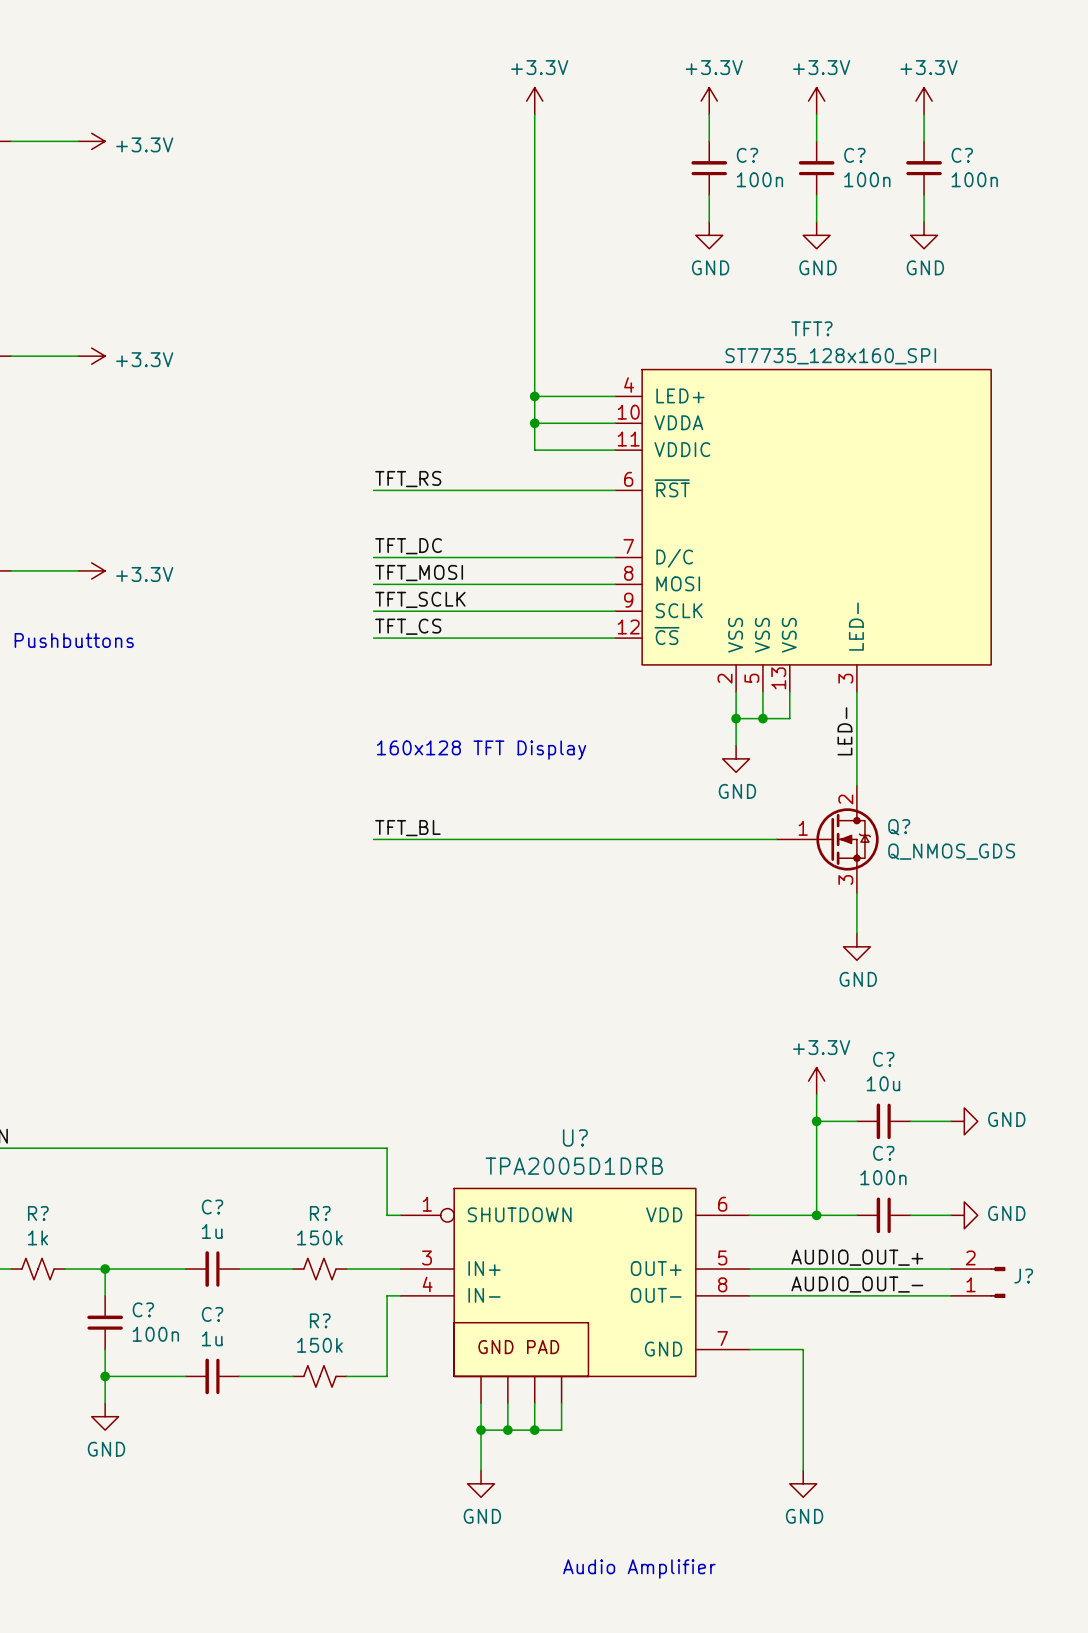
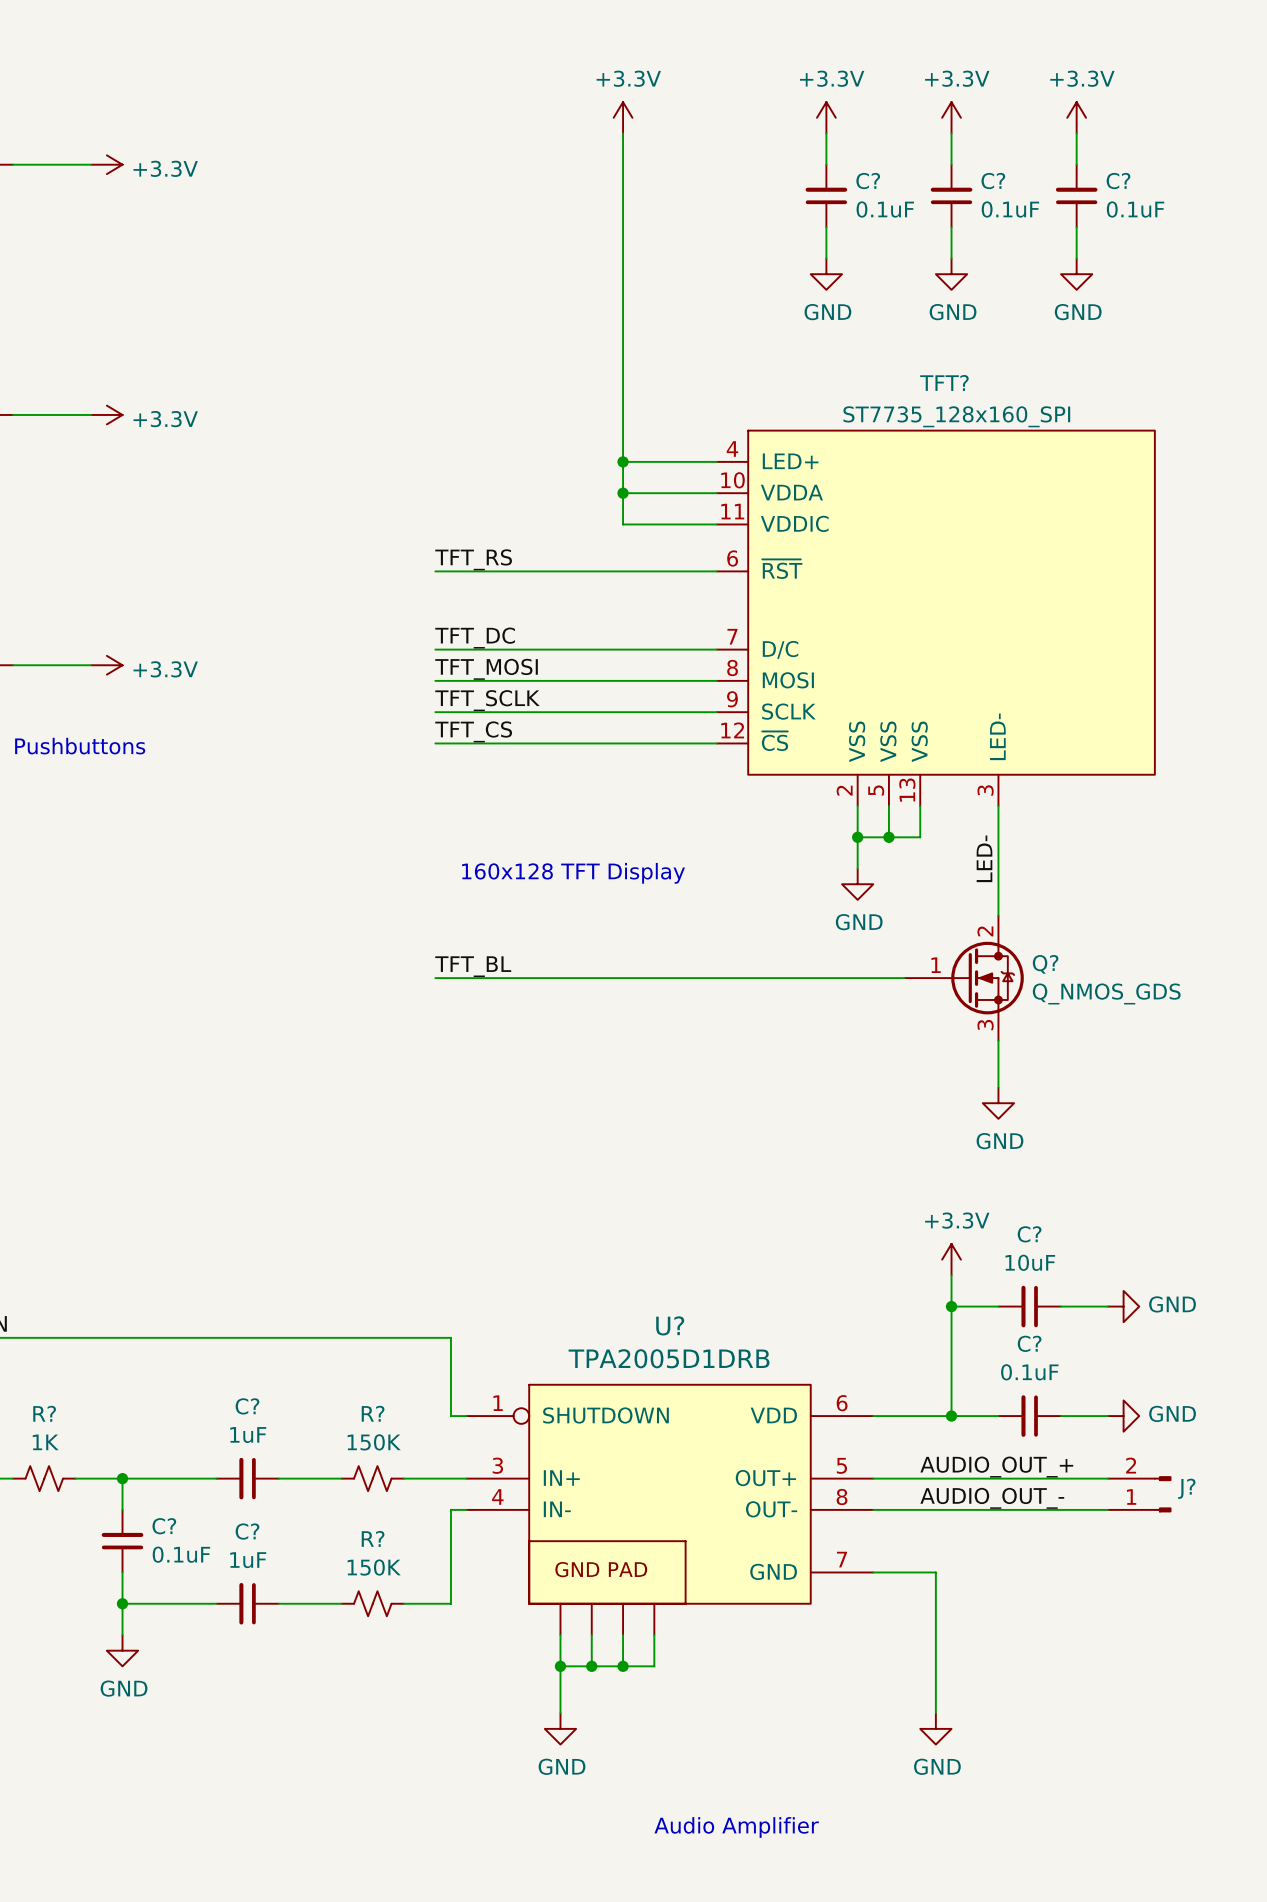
C? value: 100n (759, 179) -> 0.1uF (885, 209)
C? value: 100n (867, 179) -> 0.1uF (1010, 209)
C? value: 100n (974, 179) -> 0.1uF (1135, 209)
C? value: 10u (883, 1083) -> 10uF (1030, 1262)
C? value: 100n (883, 1177) -> 0.1uF (1029, 1372)
C? value: 1u (212, 1231) -> 1uF (248, 1435)
R? value: 1k (38, 1237) -> 1K (45, 1442)
R? value: 150k (319, 1237) -> 150K (374, 1442)
C? value: 100n (155, 1334) -> 0.1uF (181, 1554)
C? value: 1u (212, 1338) -> 1uF (248, 1560)
R? value: 150k (319, 1345) -> 150K (374, 1567)

